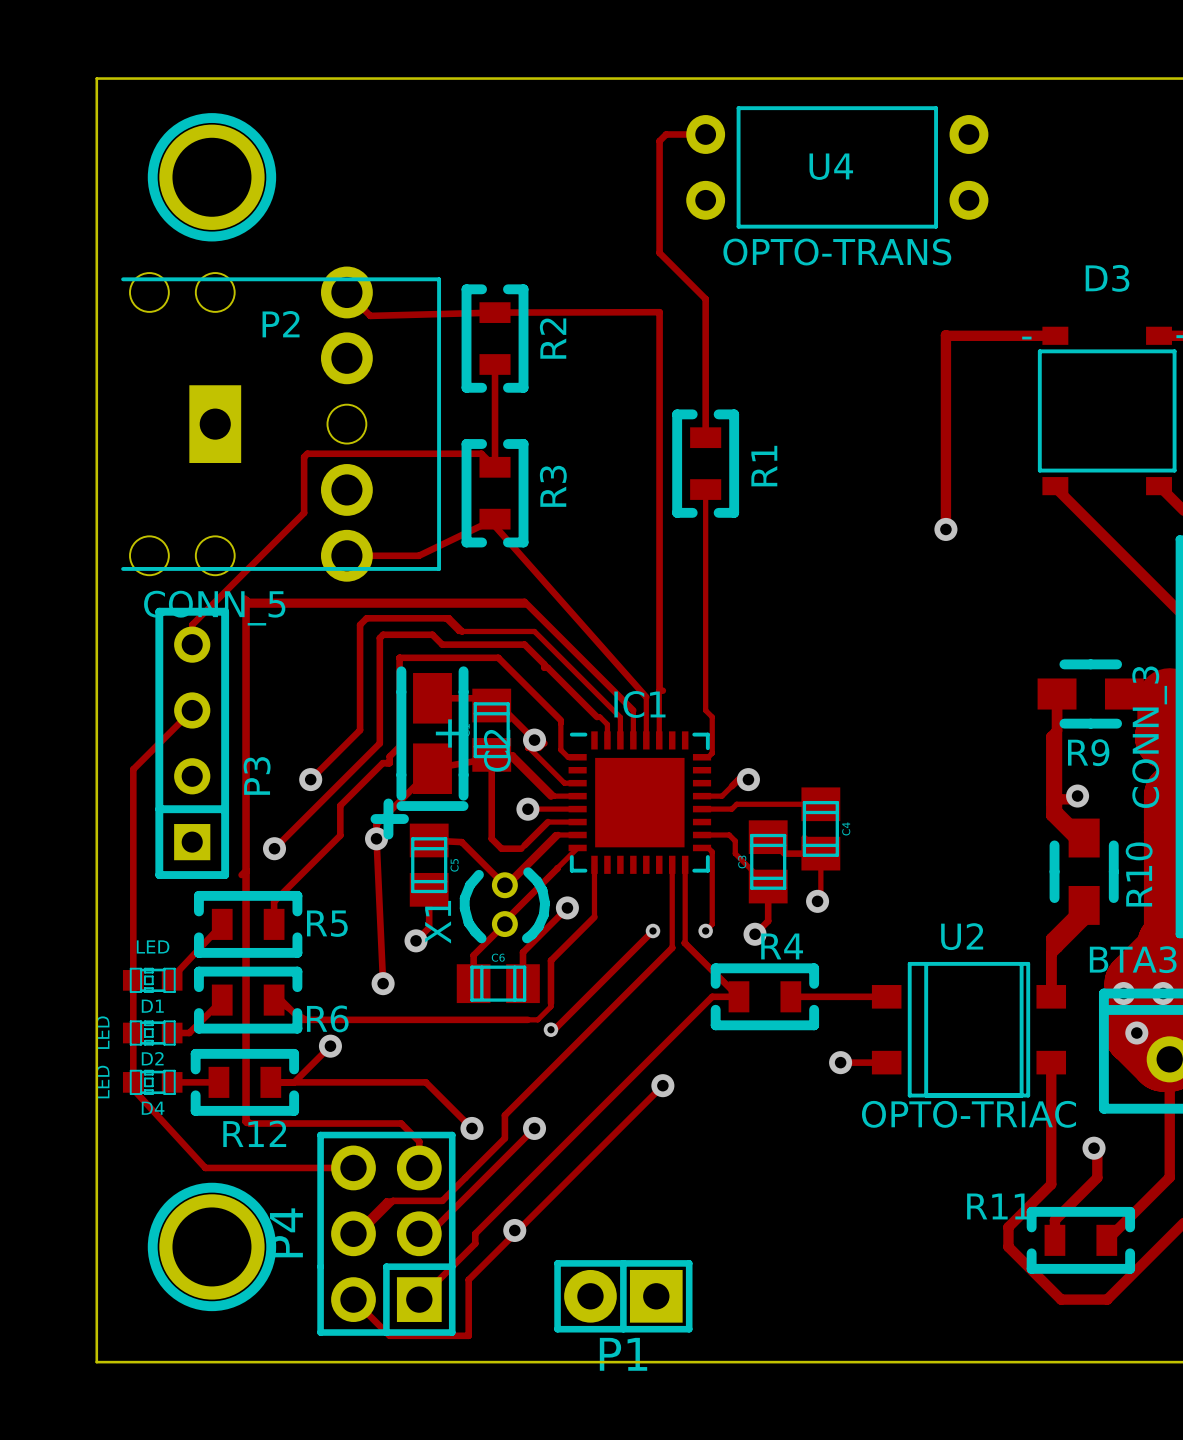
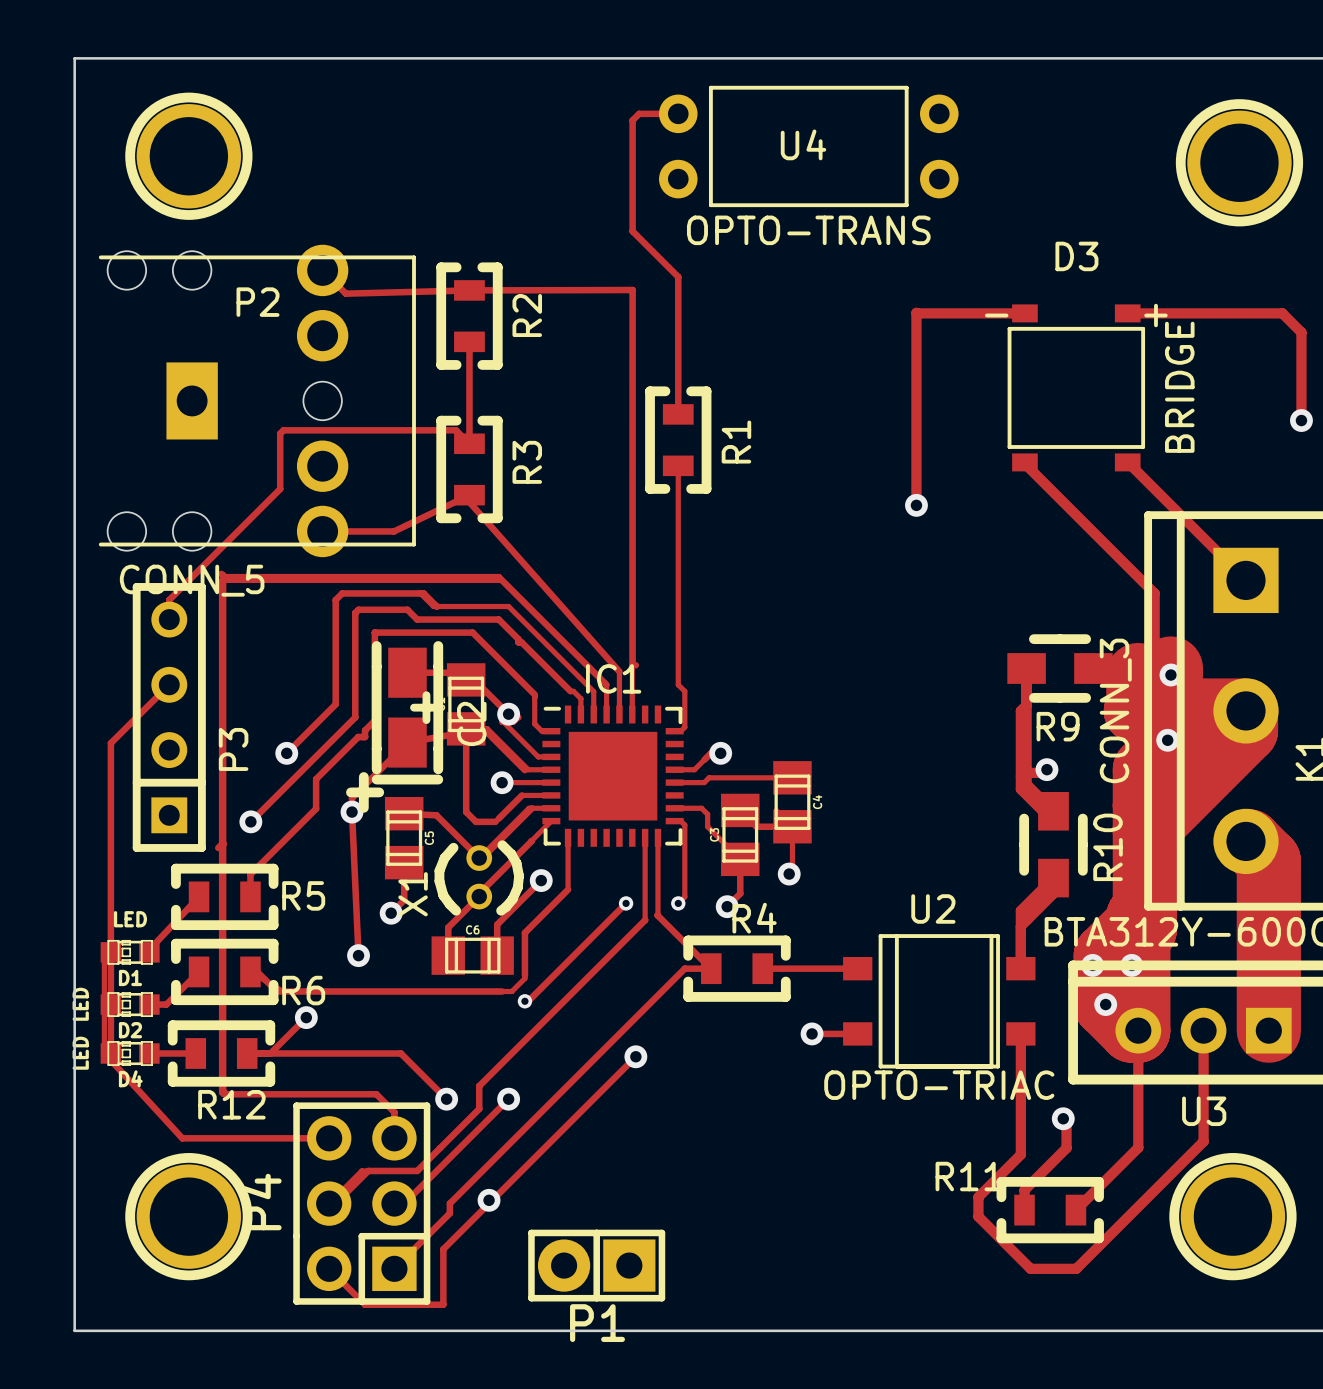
track: none -> (104, 955) (104, 1053)

